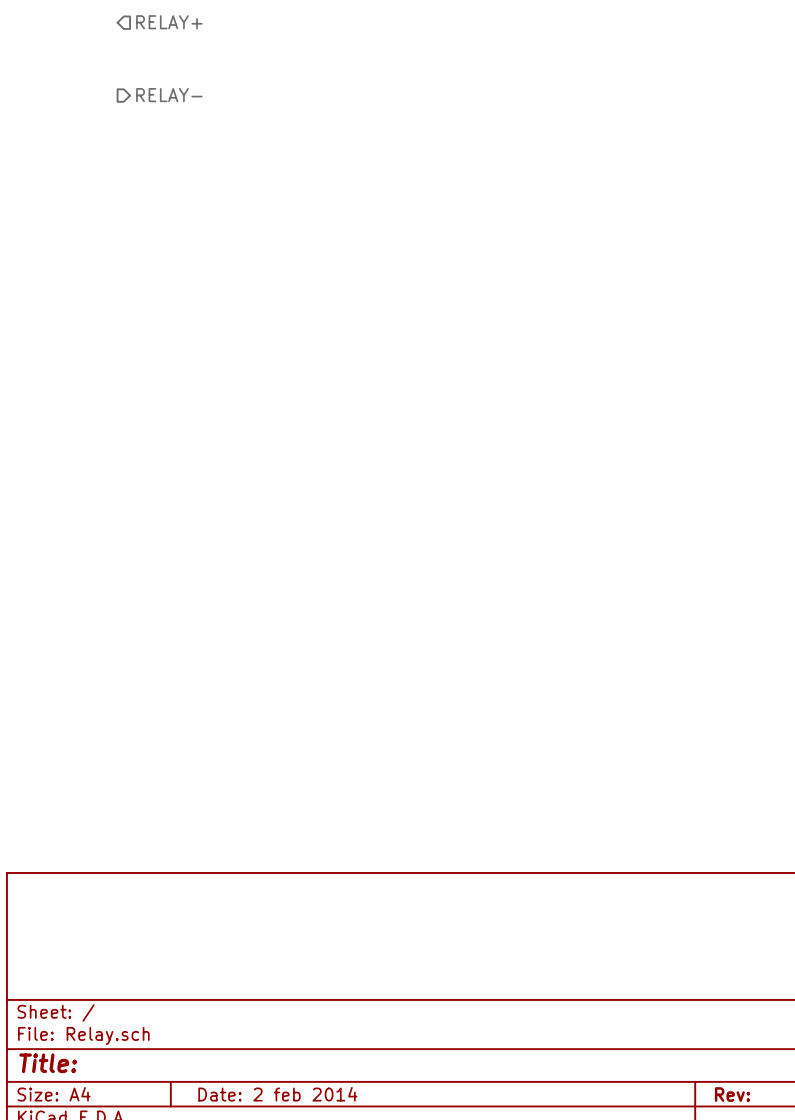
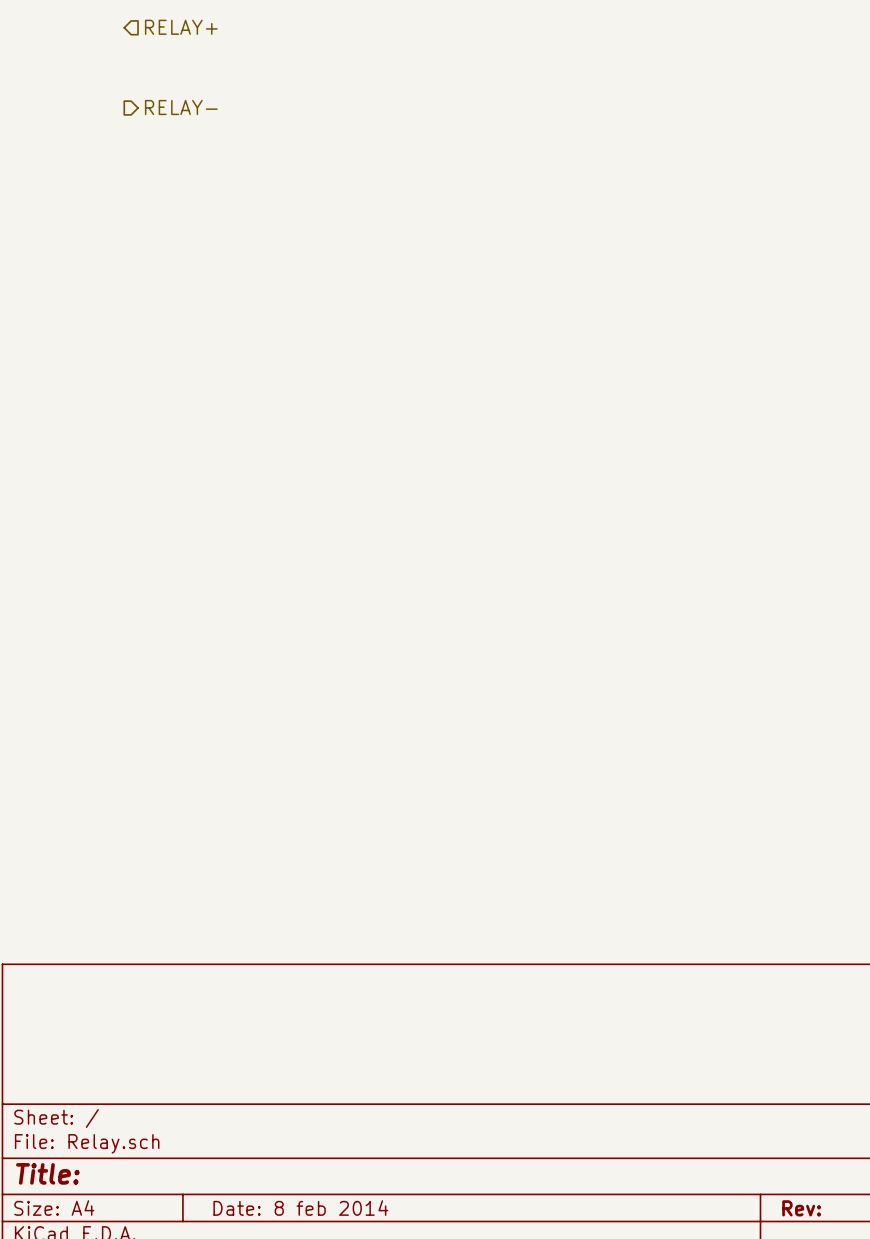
title block: Date: 2 feb 2014 (277, 1094) -> Date: 8 feb 2014 (300, 1208)

